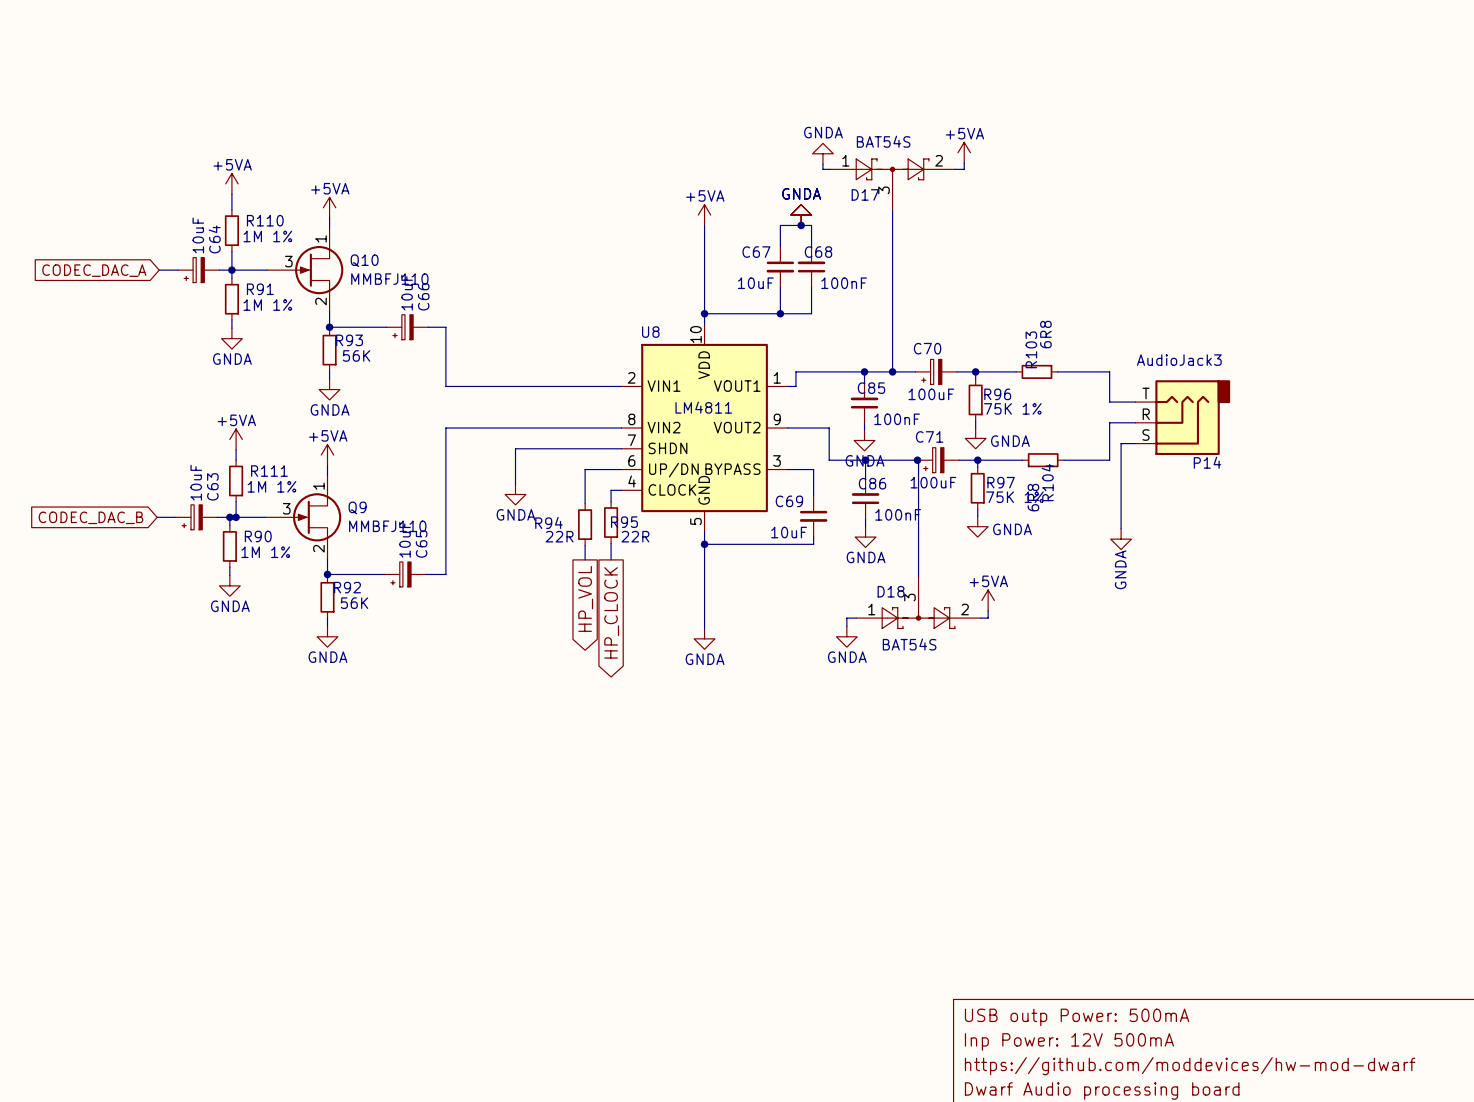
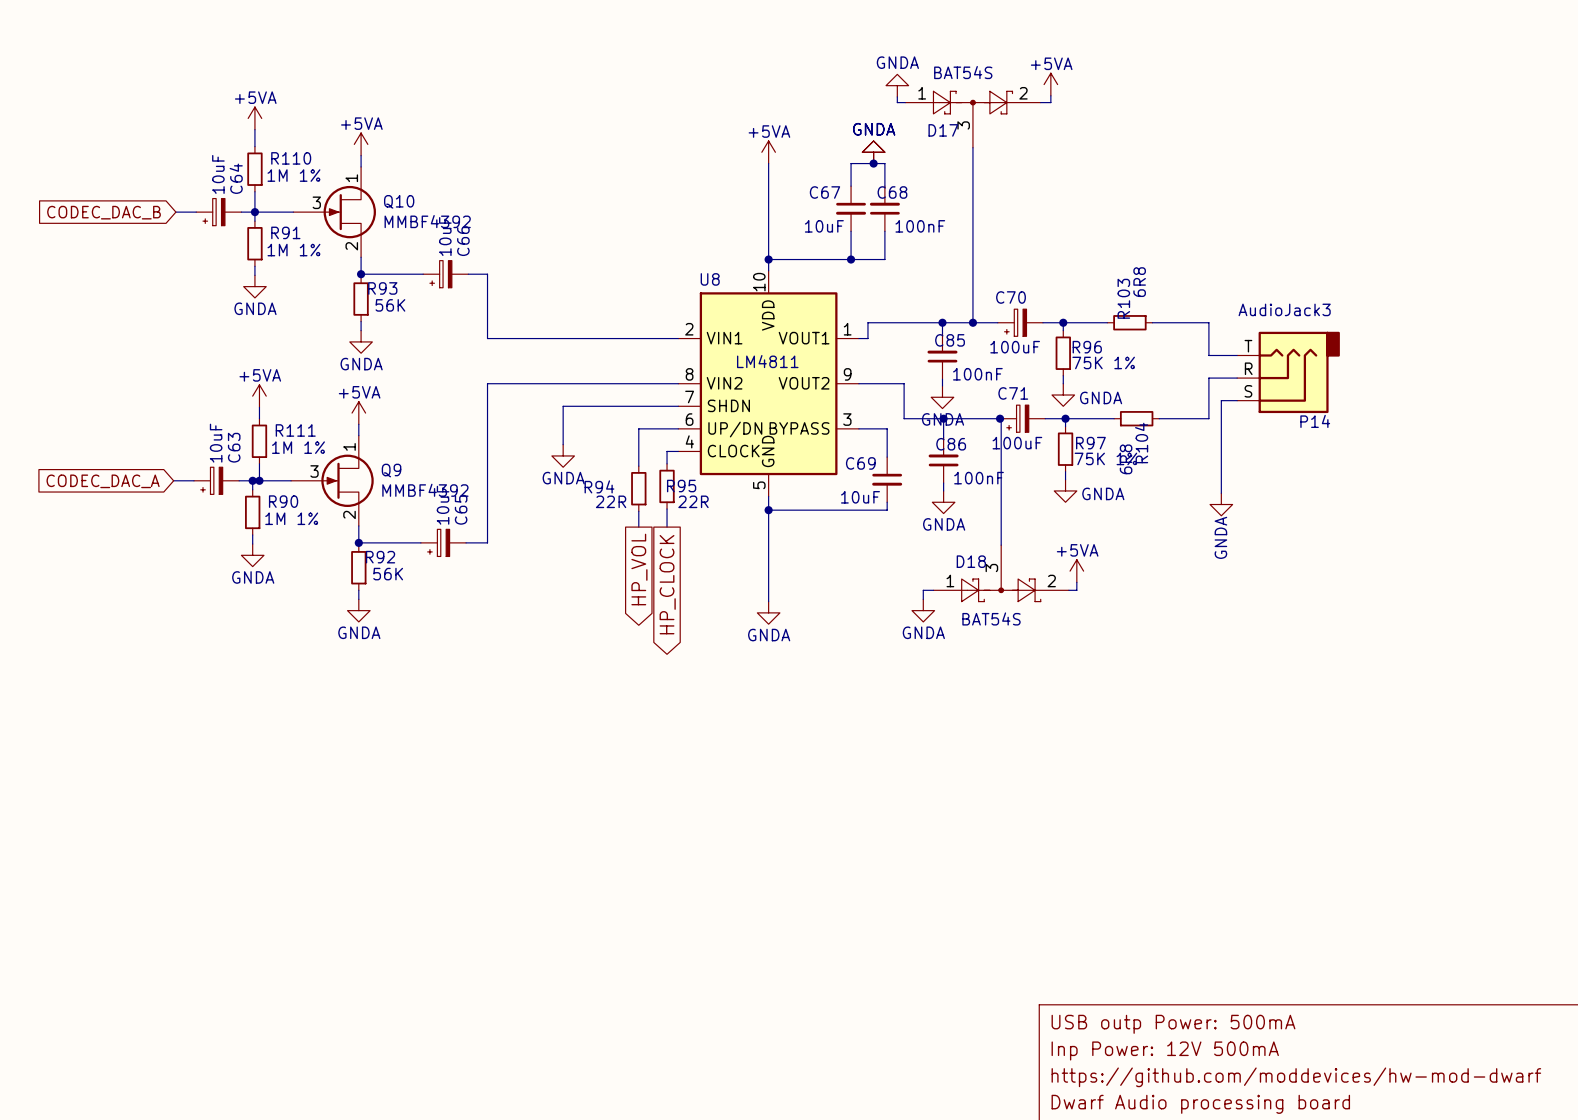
global label: CODEC_DAC_A (94, 270) -> CODEC_DAC_B (104, 212)
Q10 value: MMBFJ110 (389, 279) -> MMBF4392 (427, 221)
global label: CODEC_DAC_B (90, 517) -> CODEC_DAC_A (103, 481)
Q9 value: MMBFJ110 (387, 526) -> MMBF4392 (425, 490)

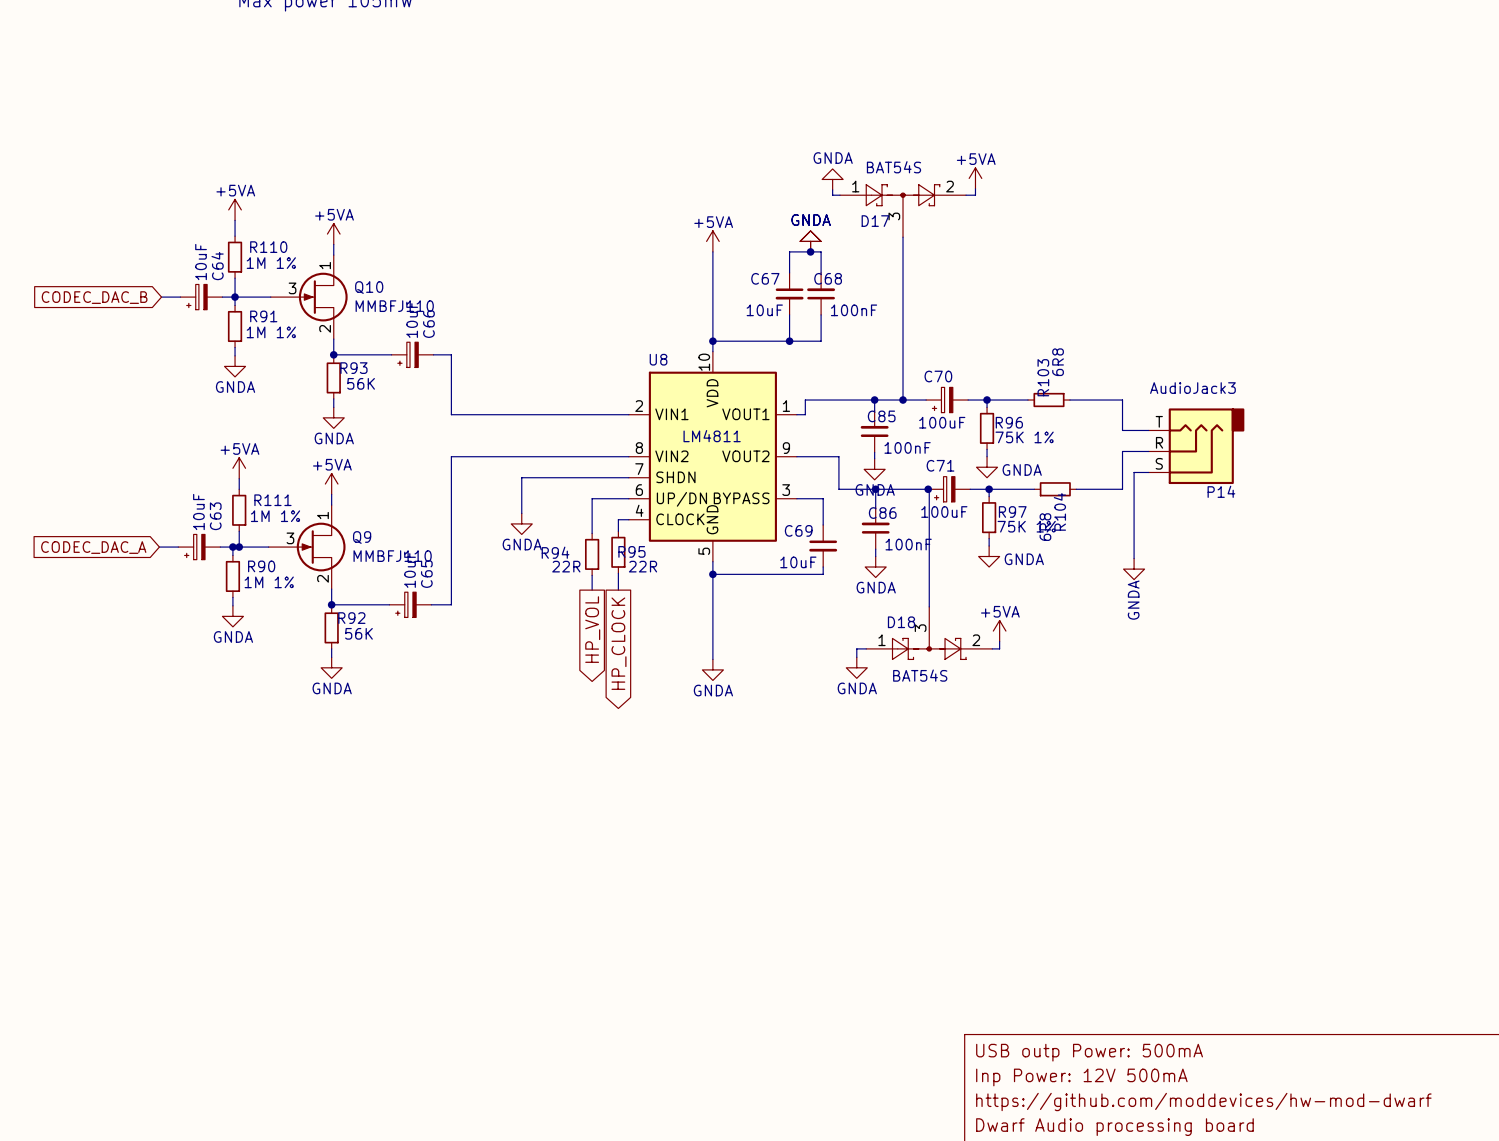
Q10 value: MMBF4392 (427, 221) -> MMBFJ110 (394, 306)
Q9 value: MMBF4392 (425, 490) -> MMBFJ110 (392, 556)

